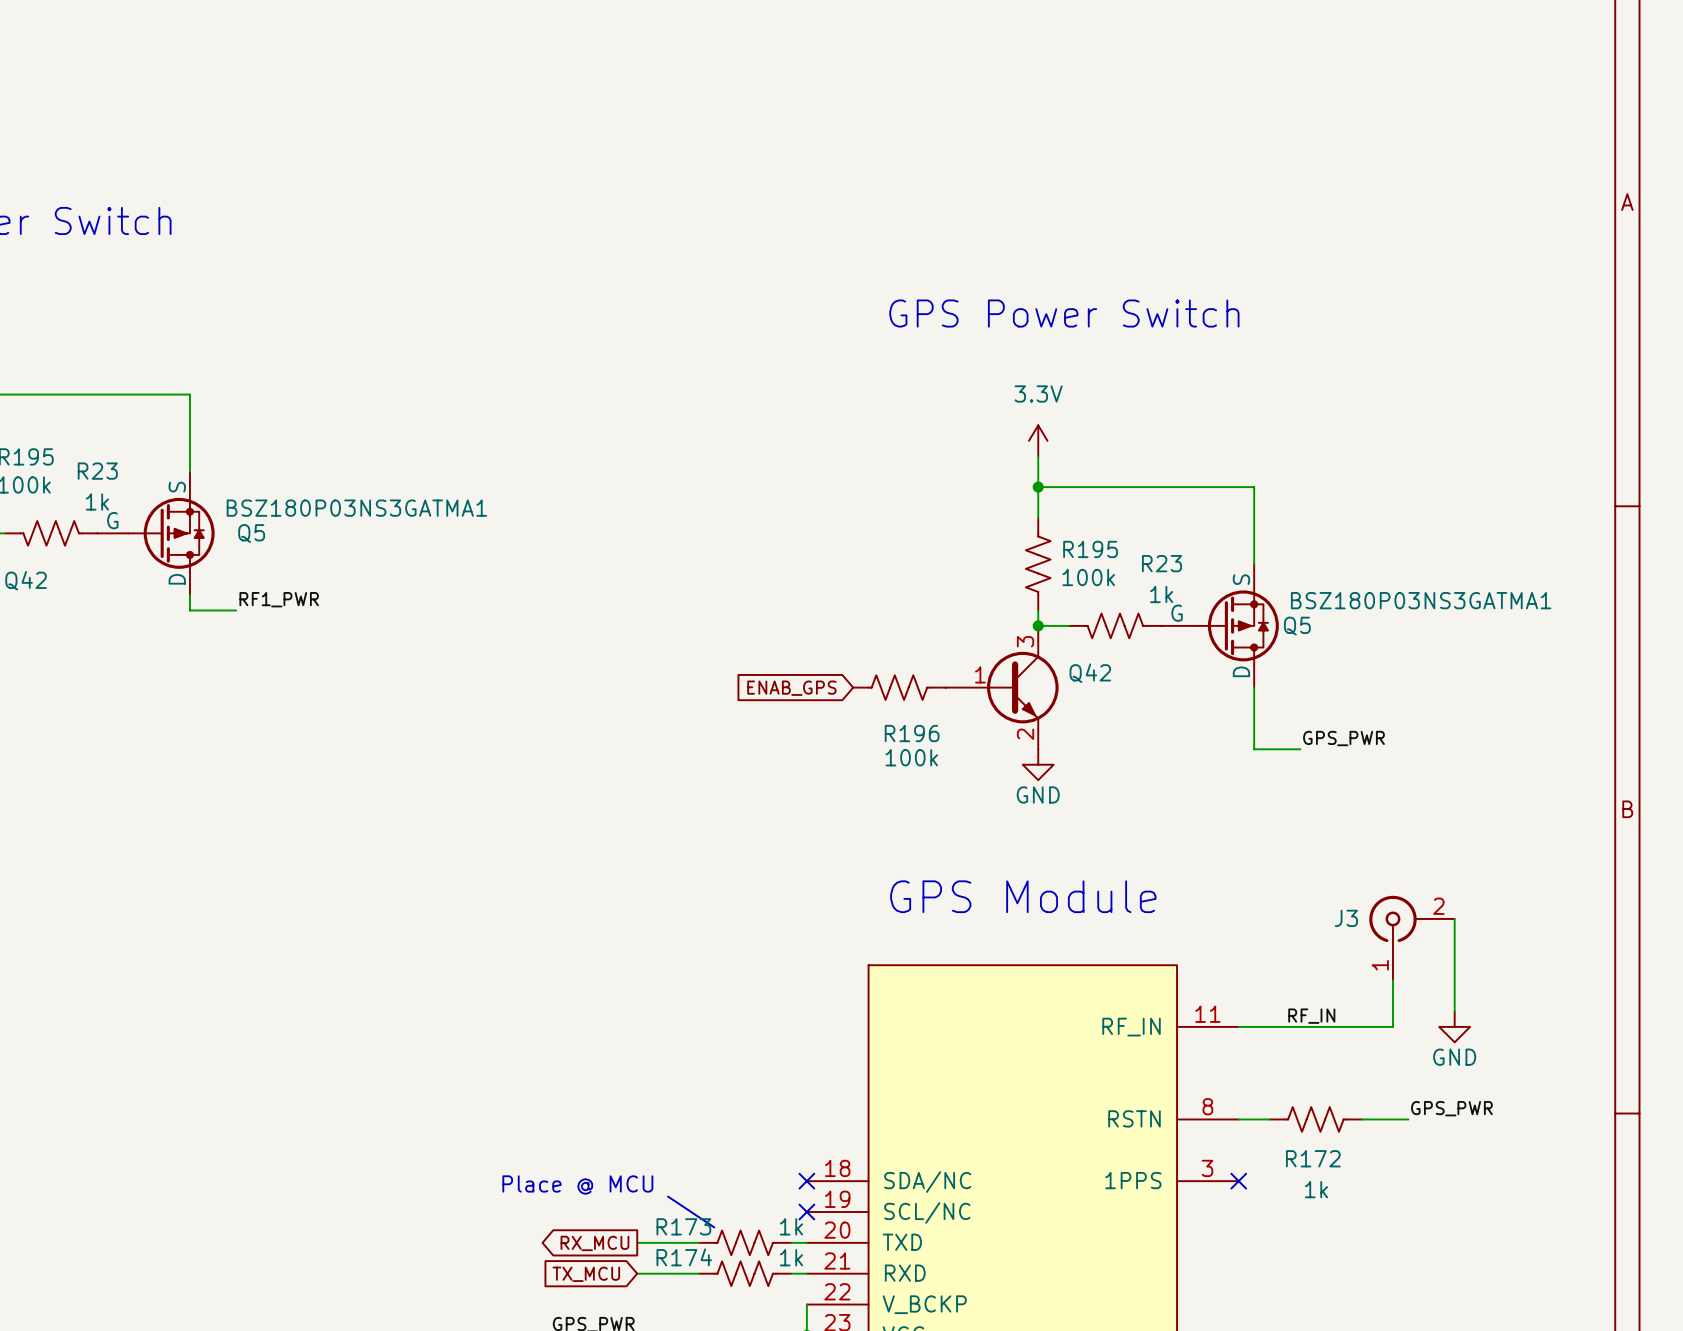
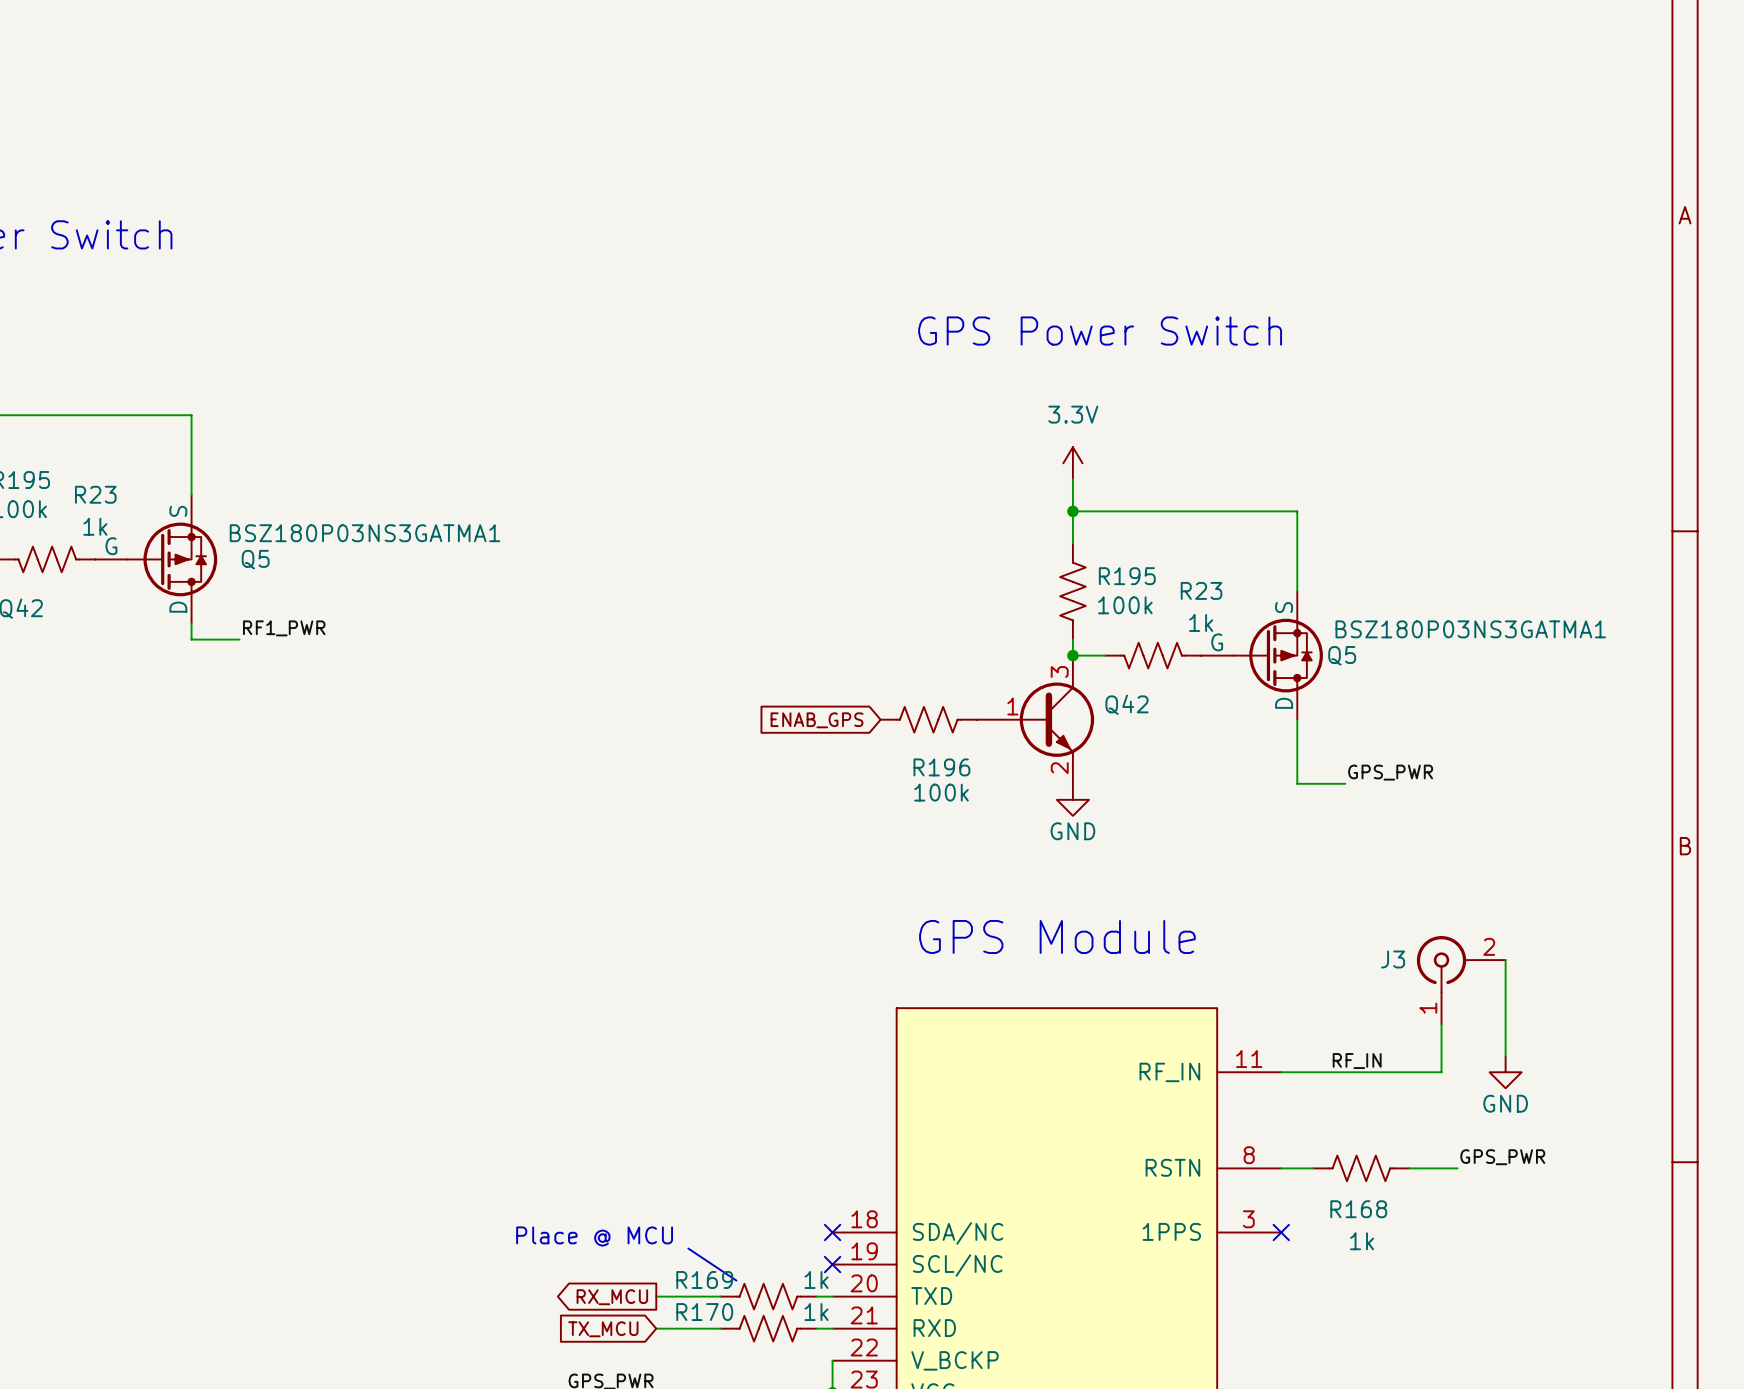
R172 name: R172 (1313, 1158) -> R168 (1358, 1209)
R173 name: R173 (683, 1226) -> R169 (704, 1279)
R174 name: R174 (684, 1257) -> R170 (704, 1312)

